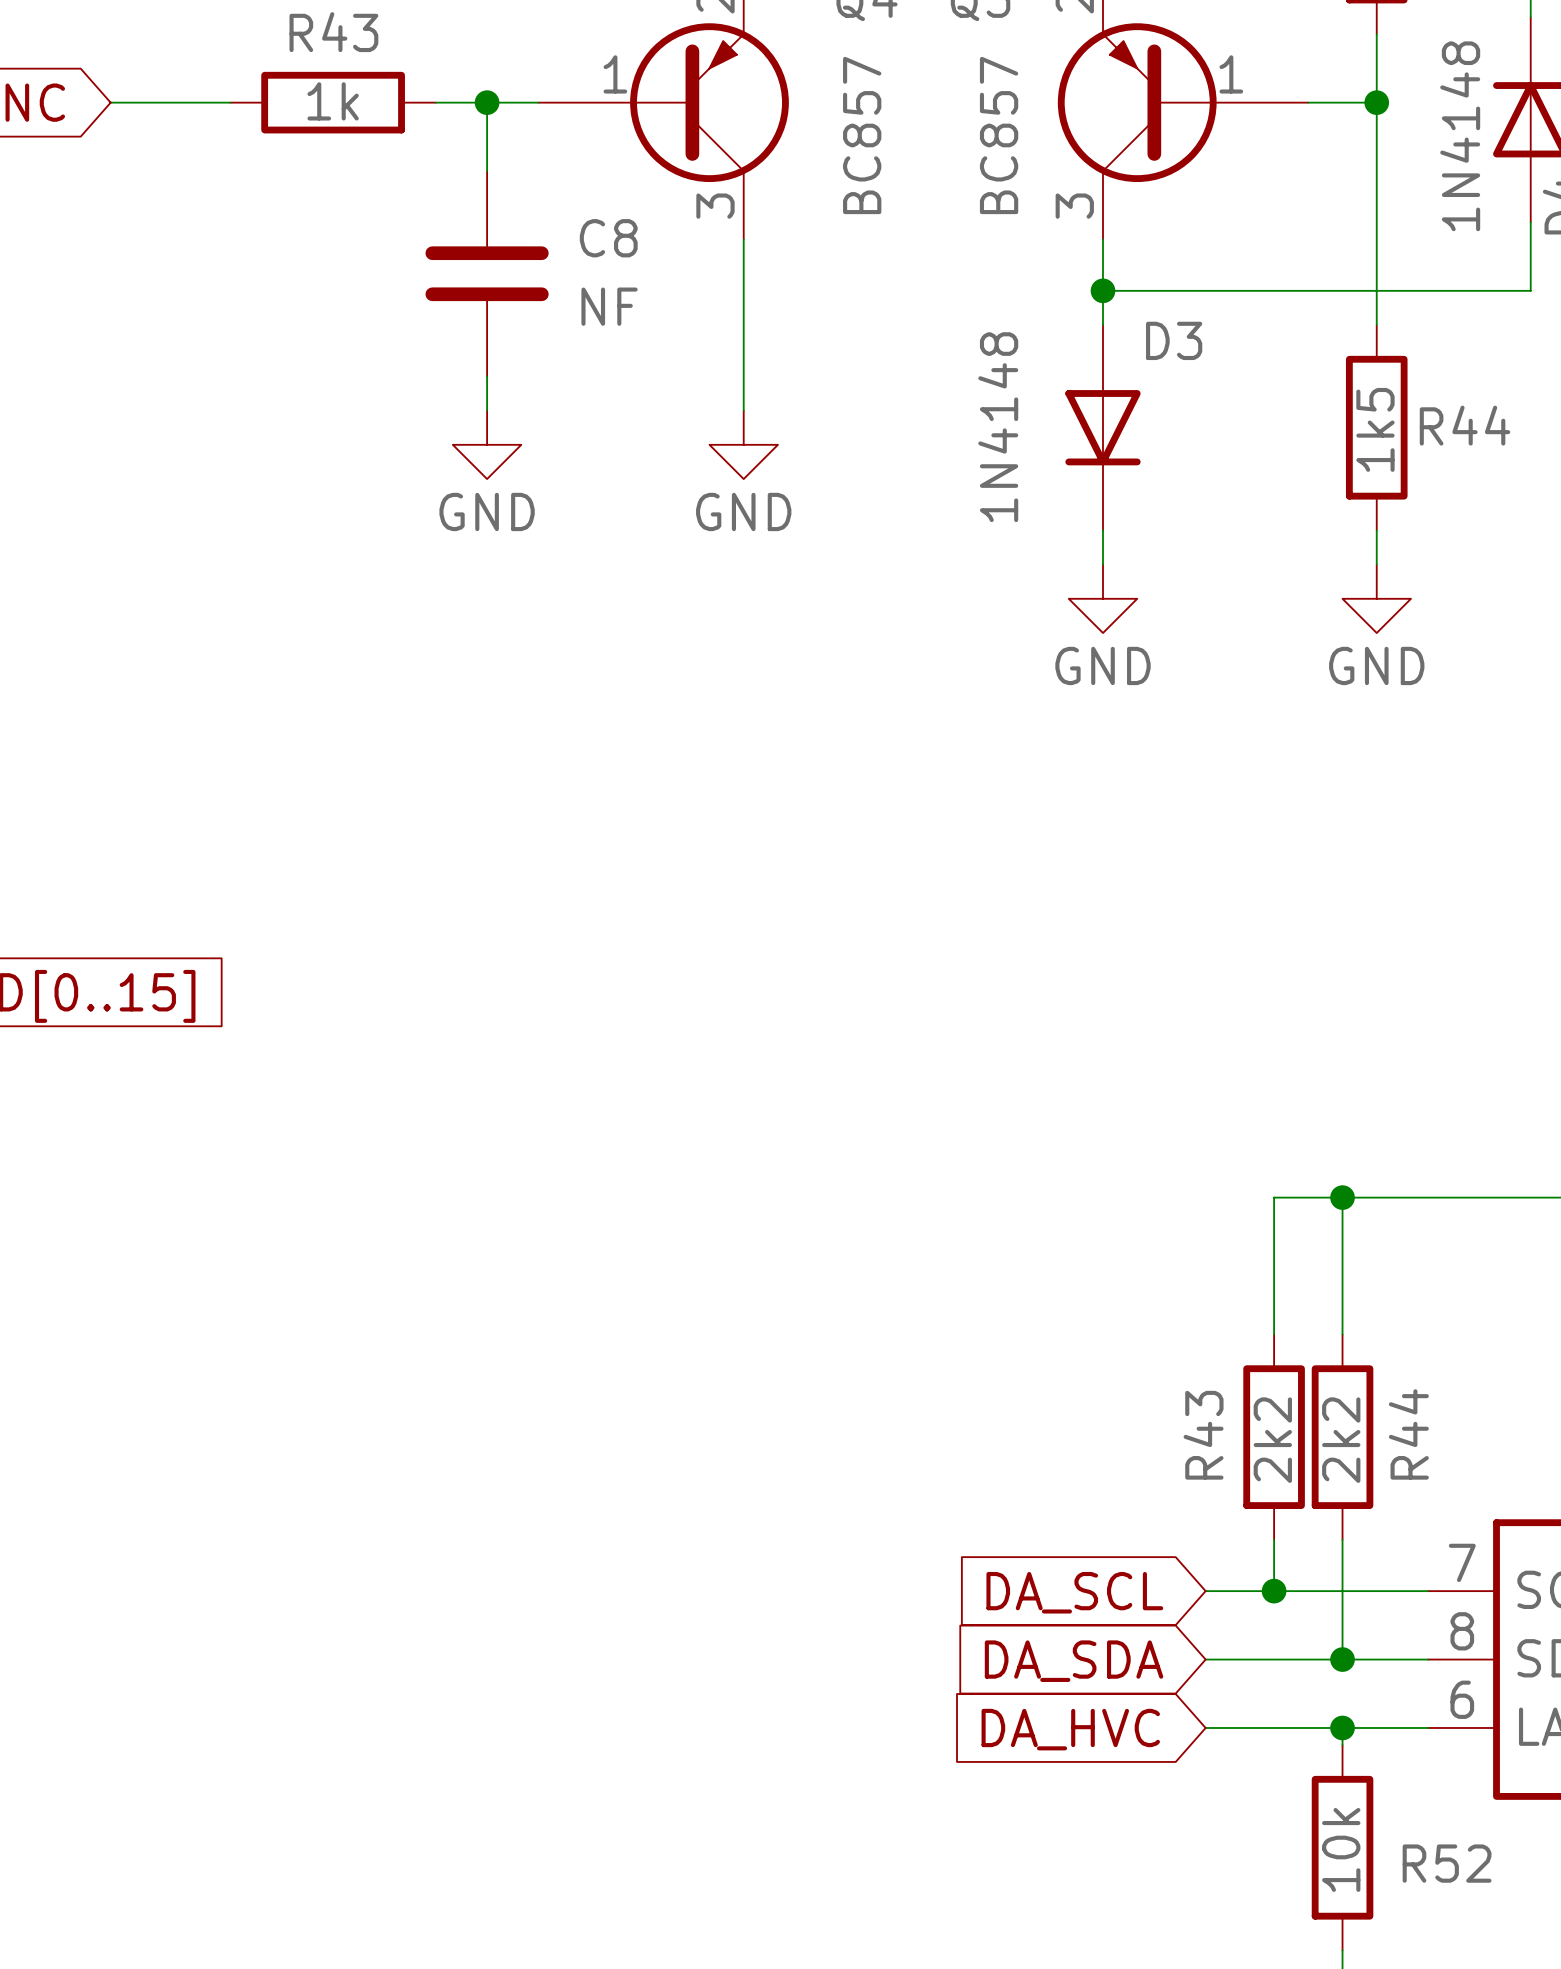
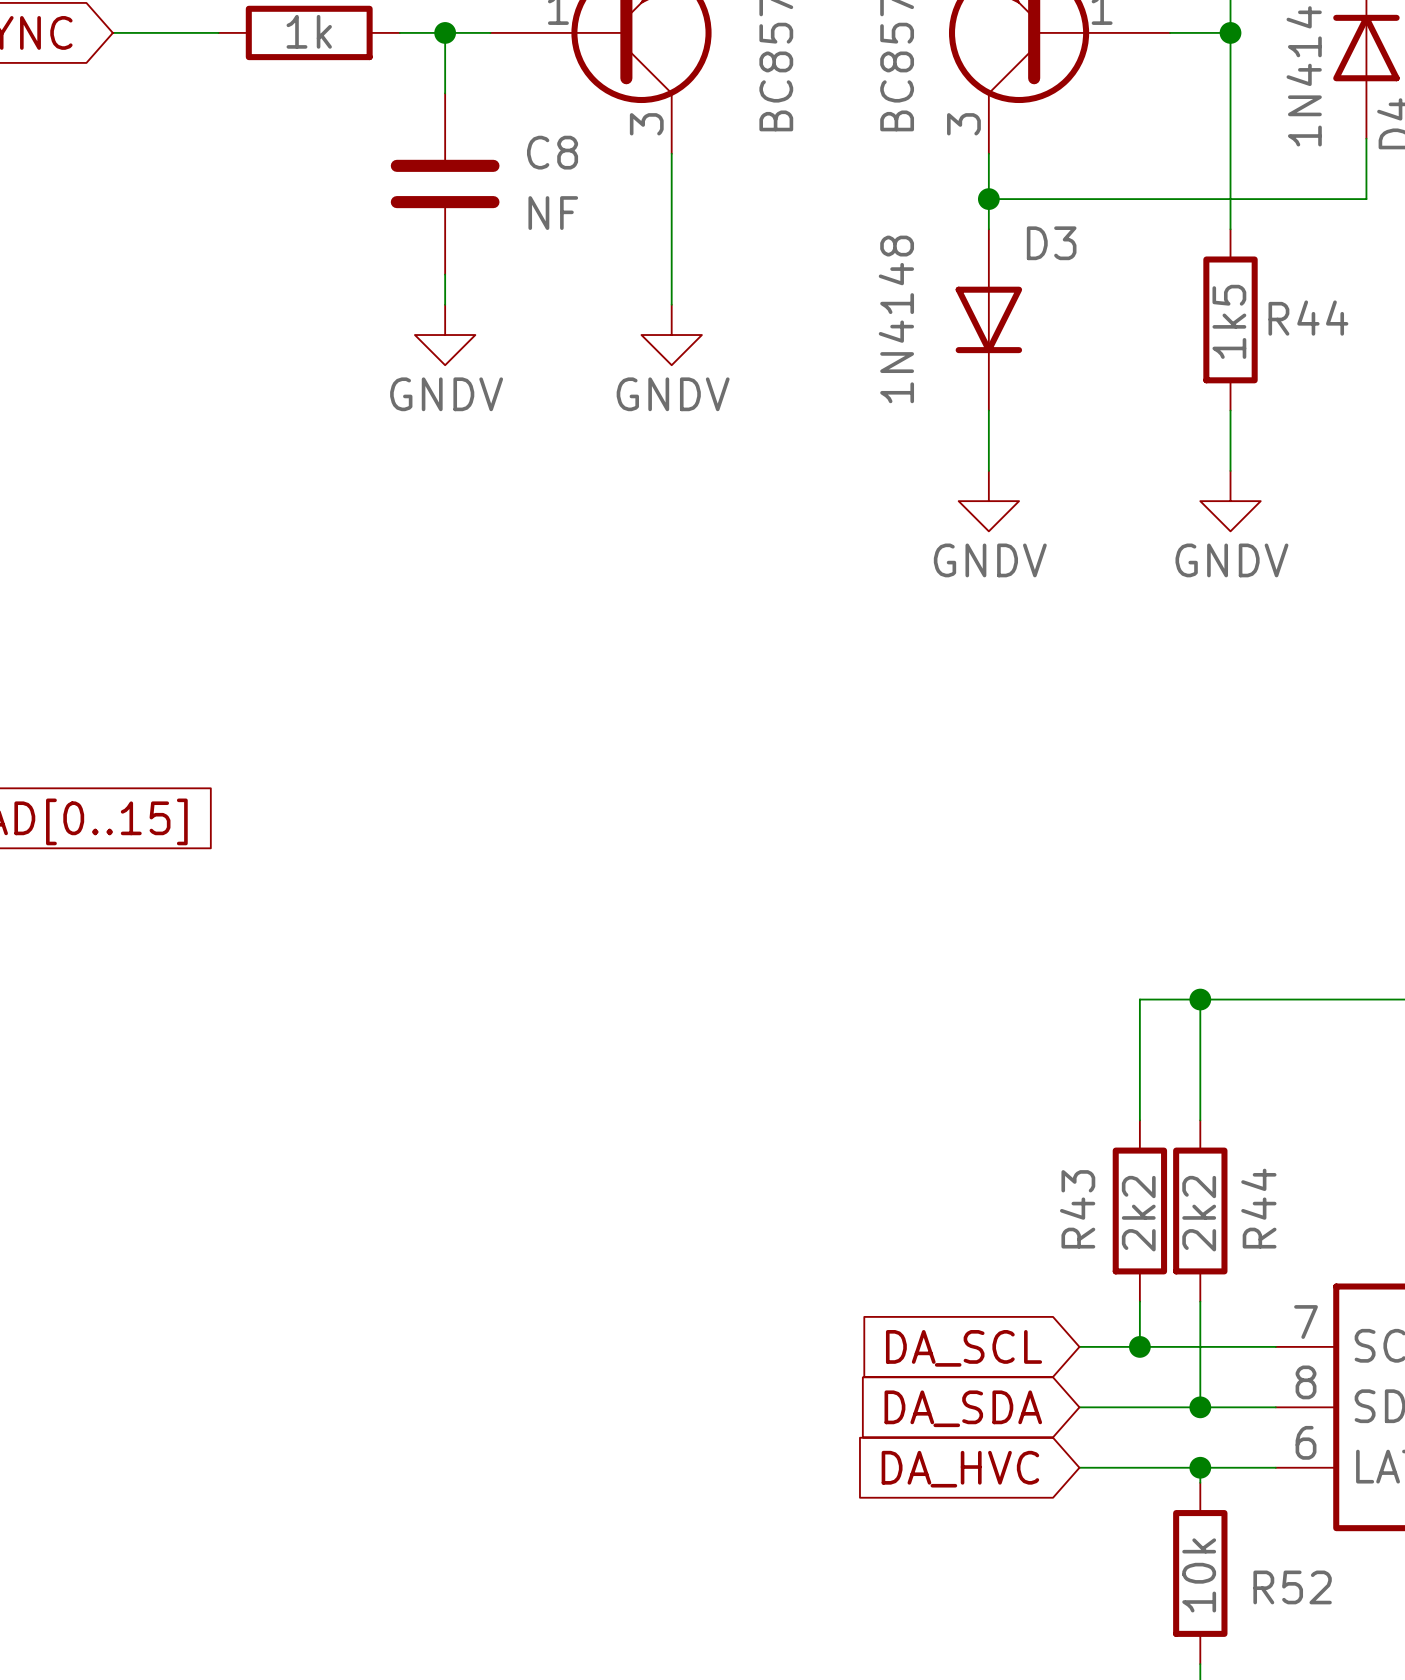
power symbol: GND (487, 444) -> GNDV (445, 335)
power symbol: GND (743, 444) -> GNDV (671, 335)
power symbol: GND (1103, 598) -> none
power symbol: GND (1376, 598) -> none
power symbol: none -> GNDV (988, 501)
power symbol: none -> GNDV (1230, 501)

